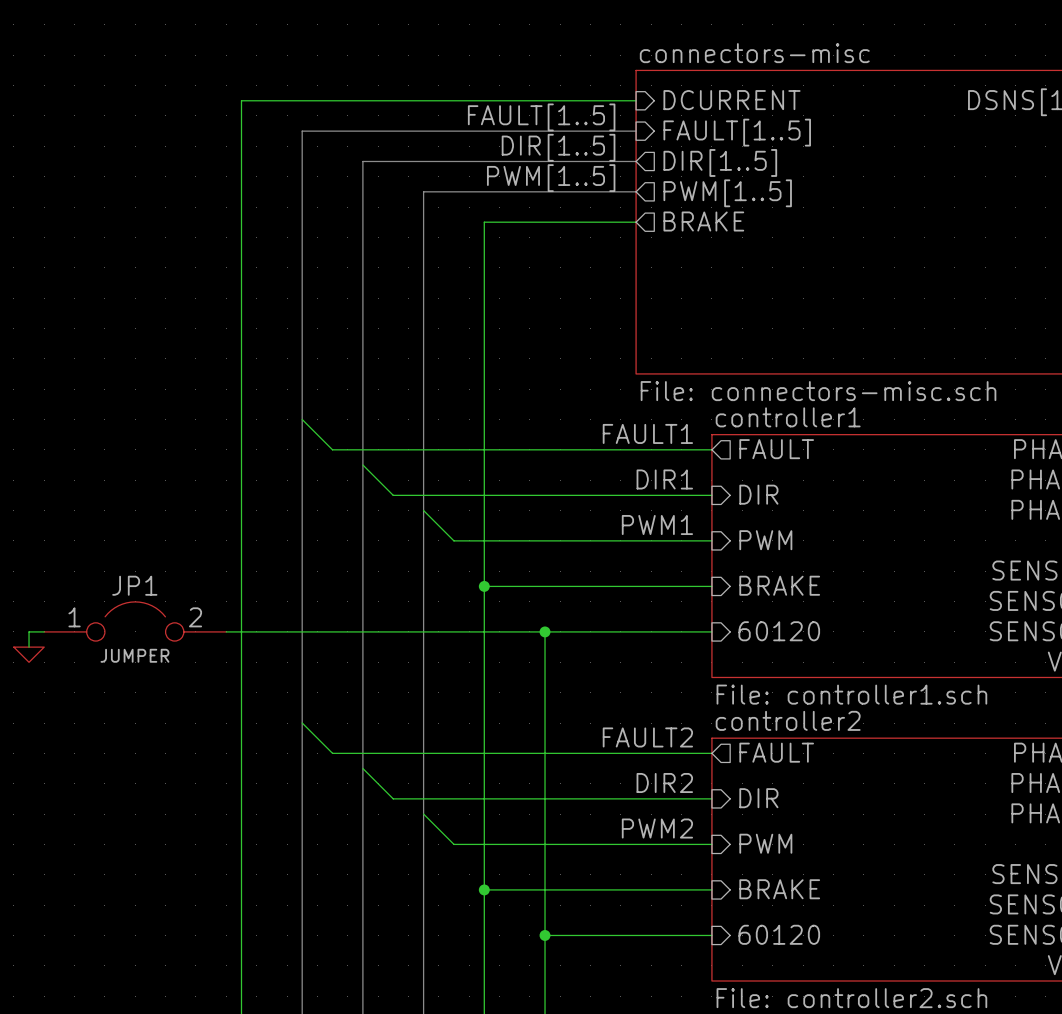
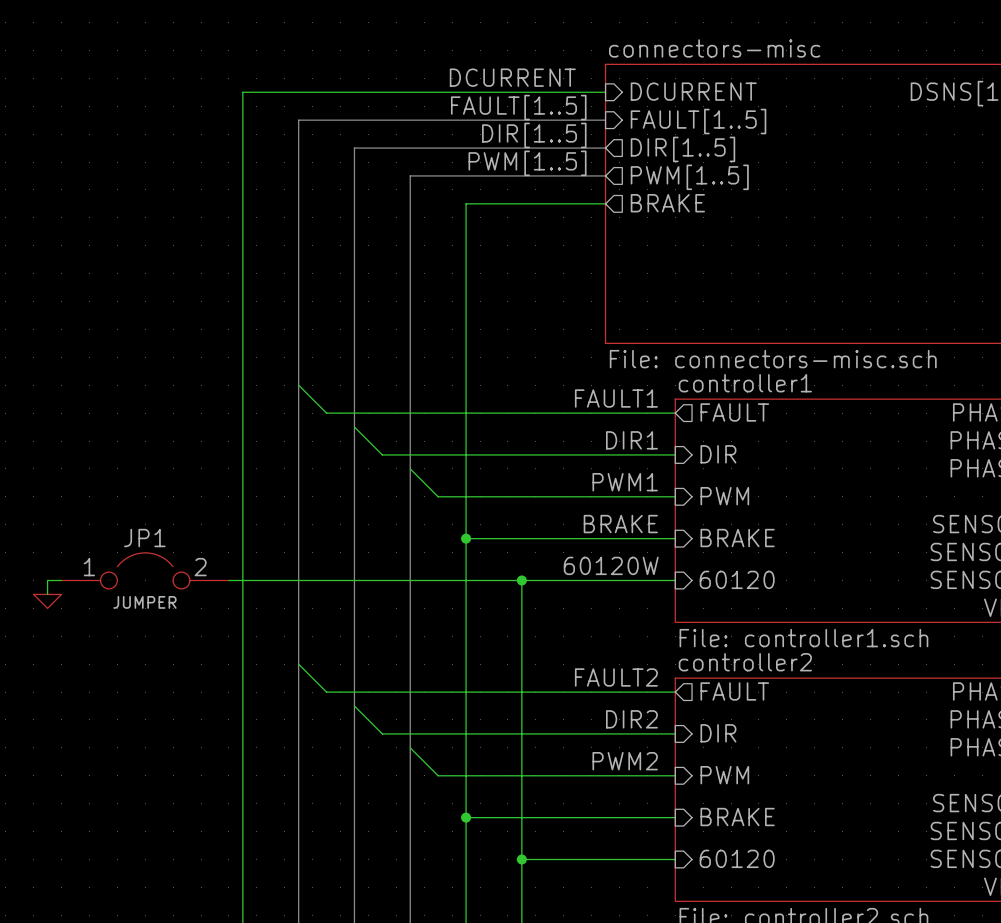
label: none -> DCURRENT (512, 77)
label: none -> BRAKE (620, 524)
label: none -> 60120W (611, 565)

